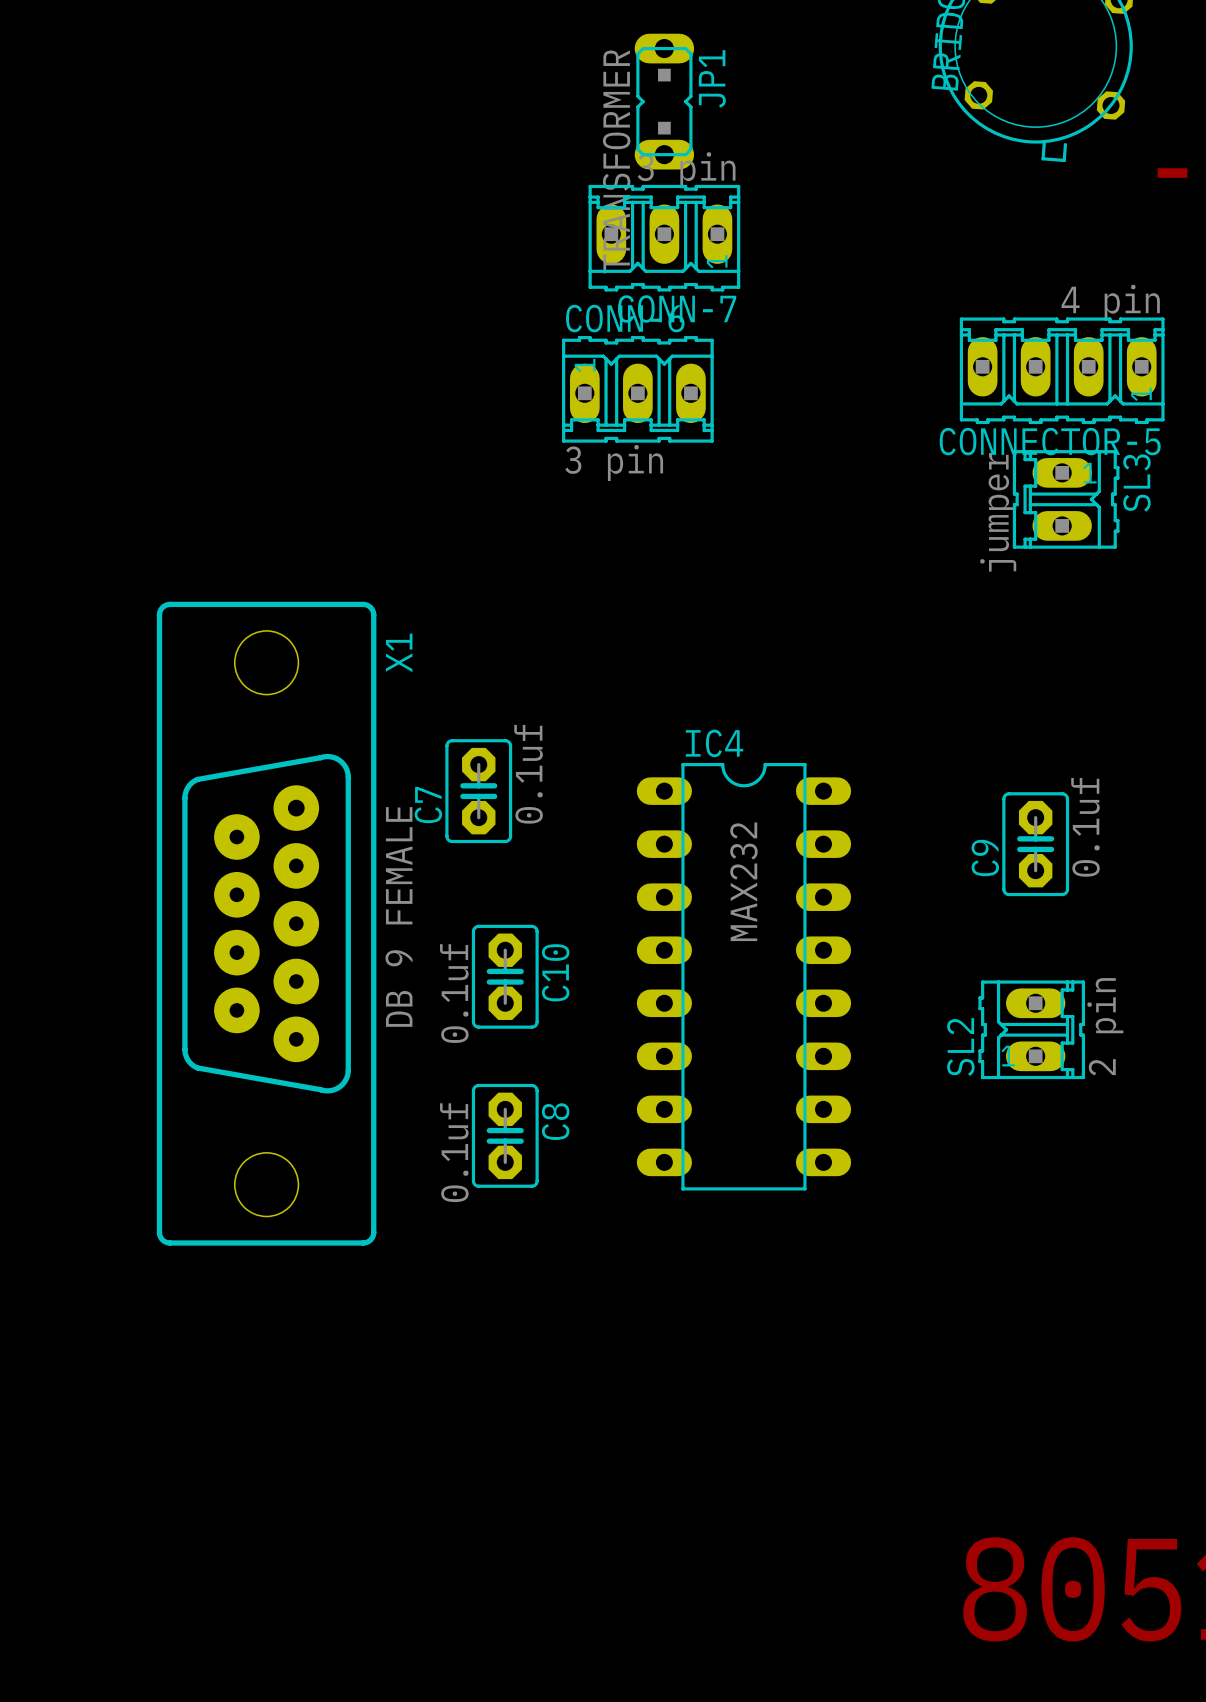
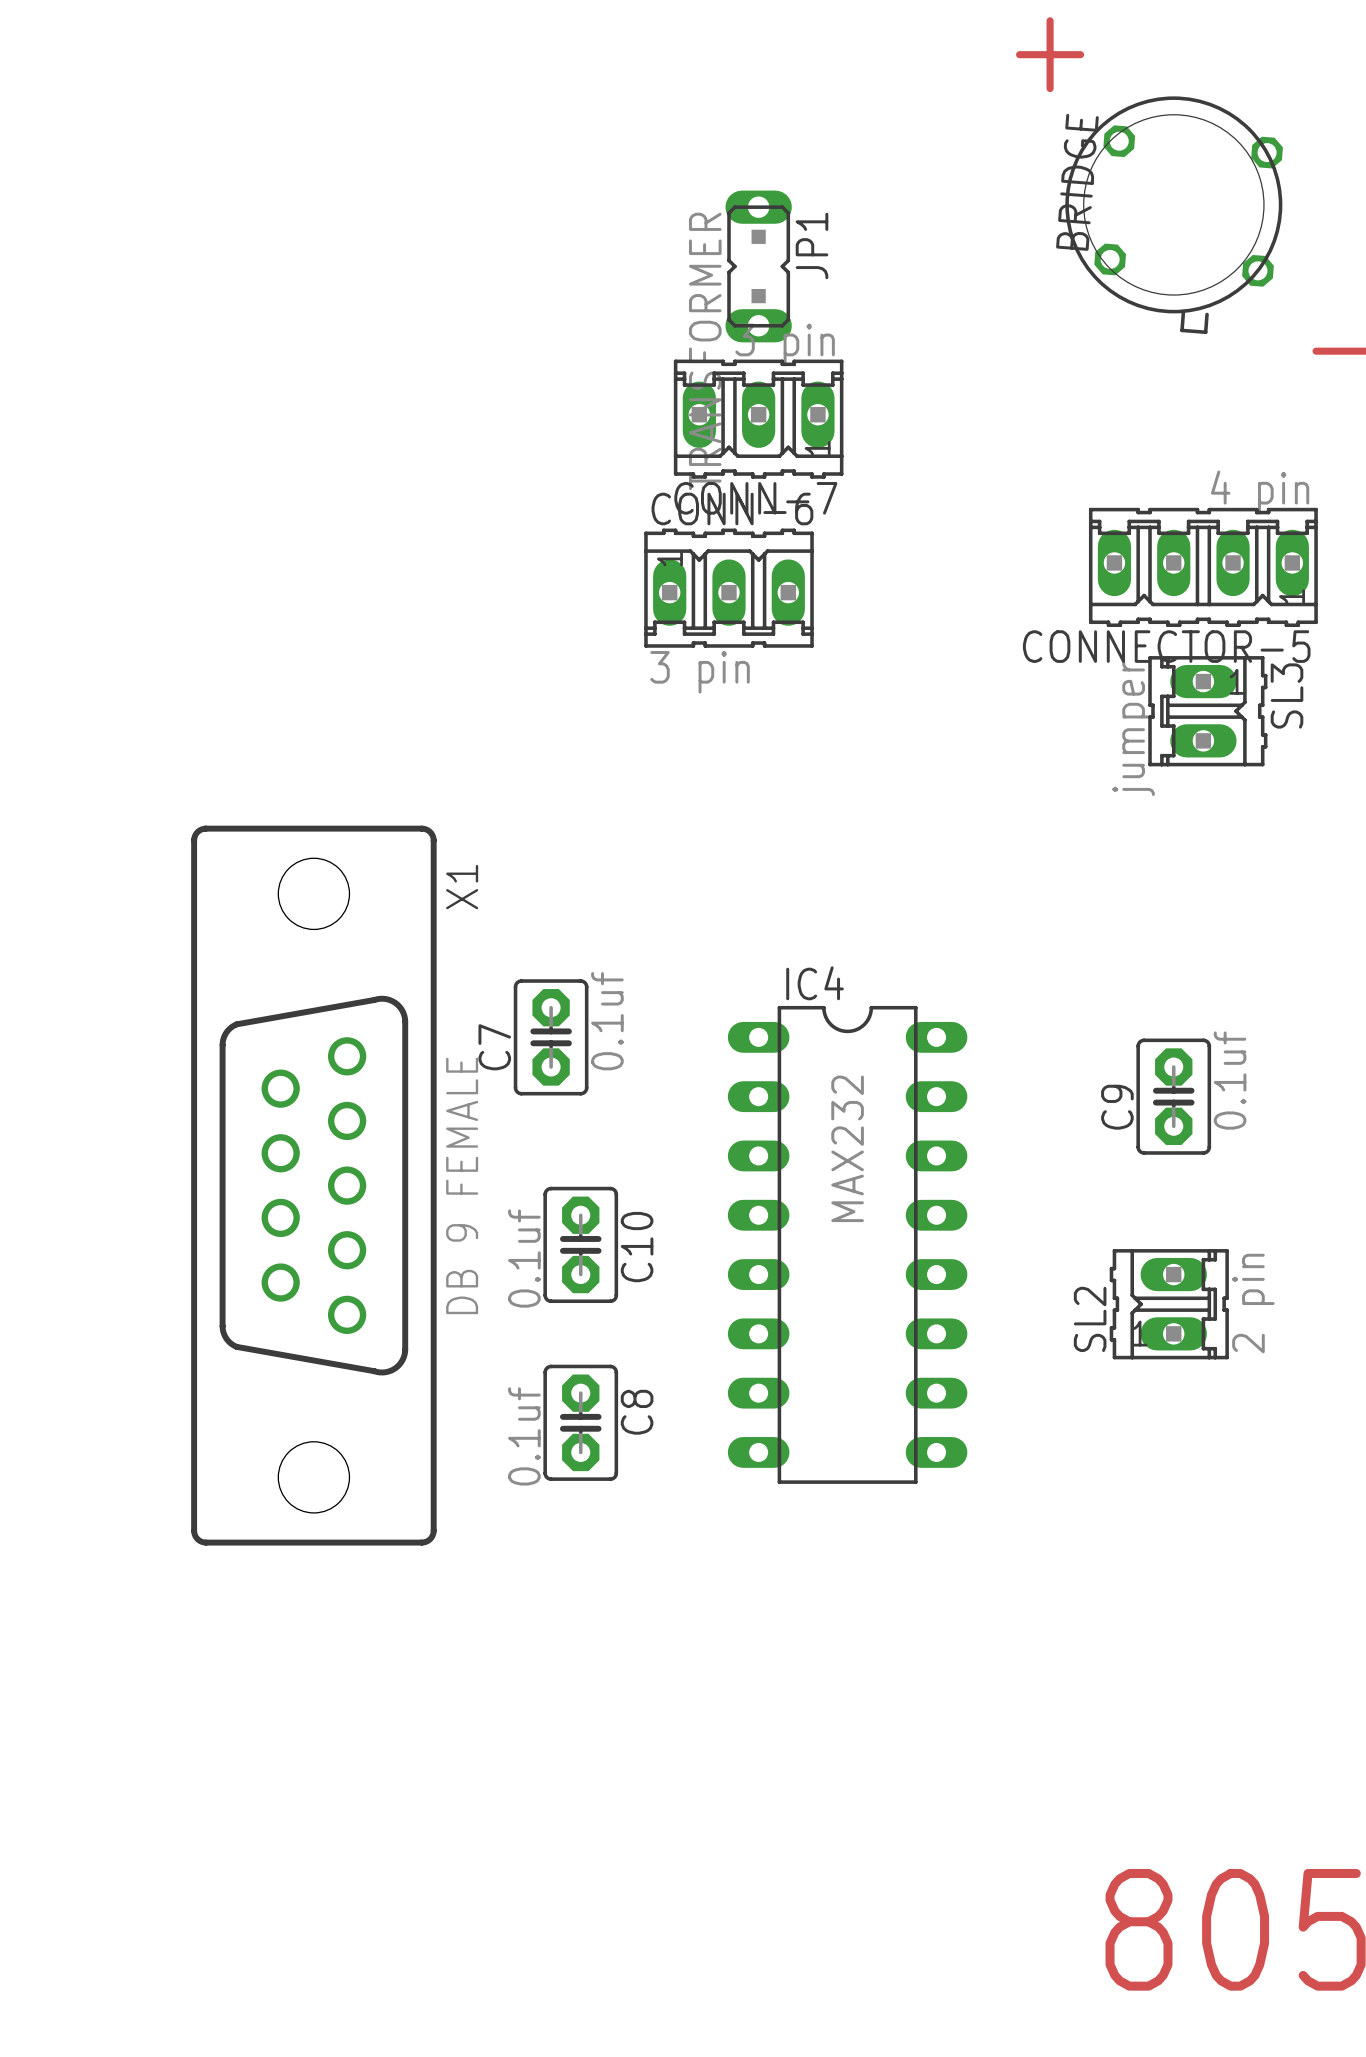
X1 footprint: [156, 601, 377, 1246] -> [191, 825, 437, 1546]

